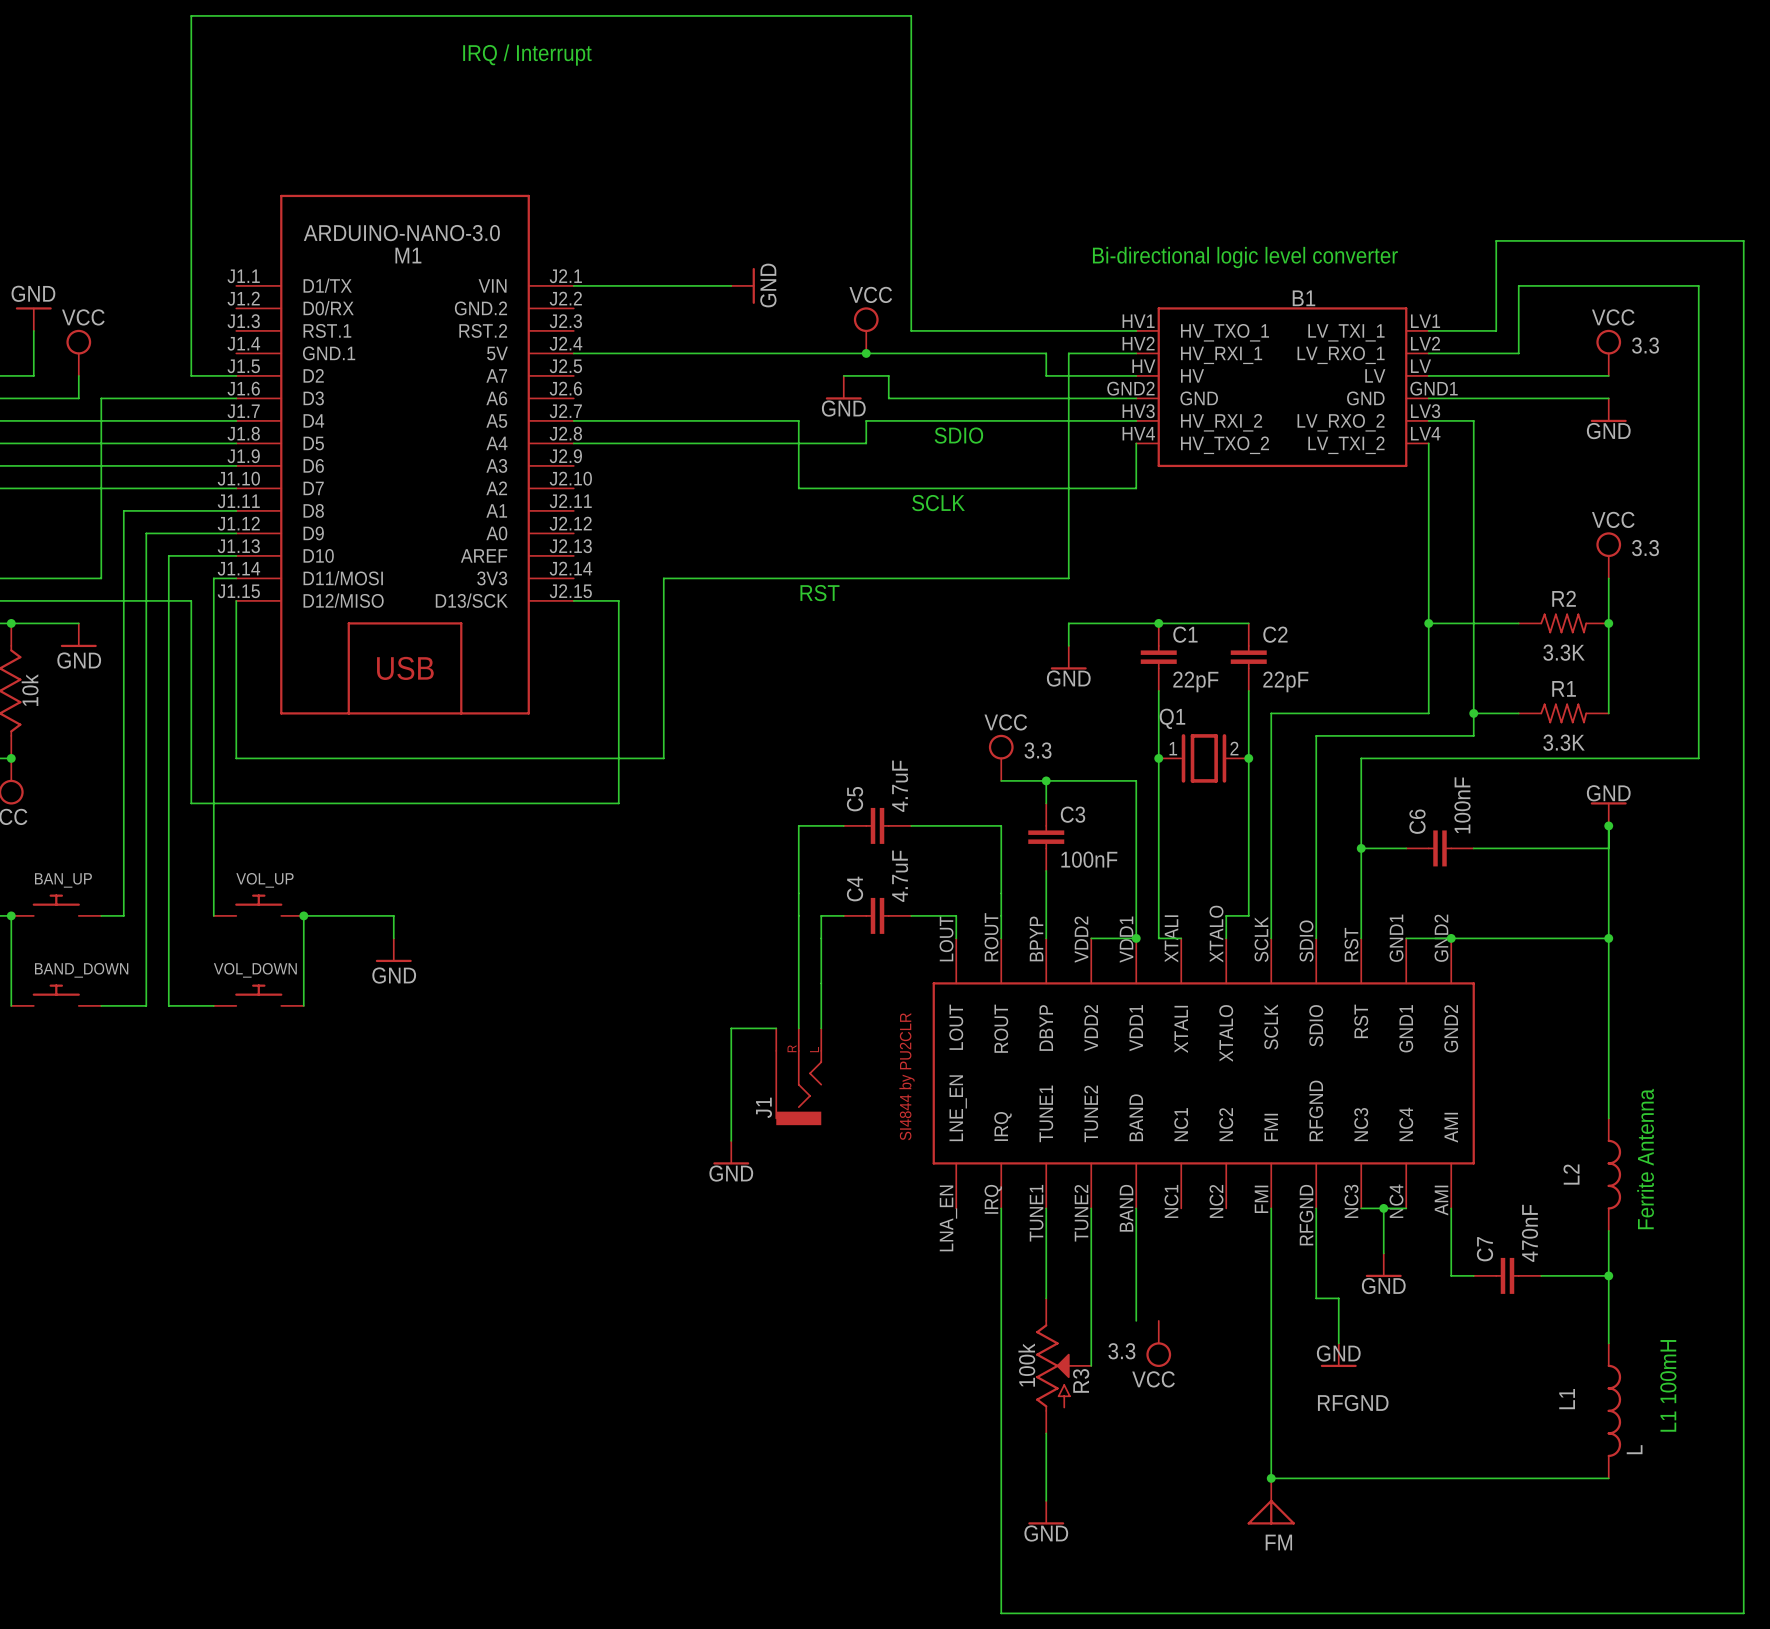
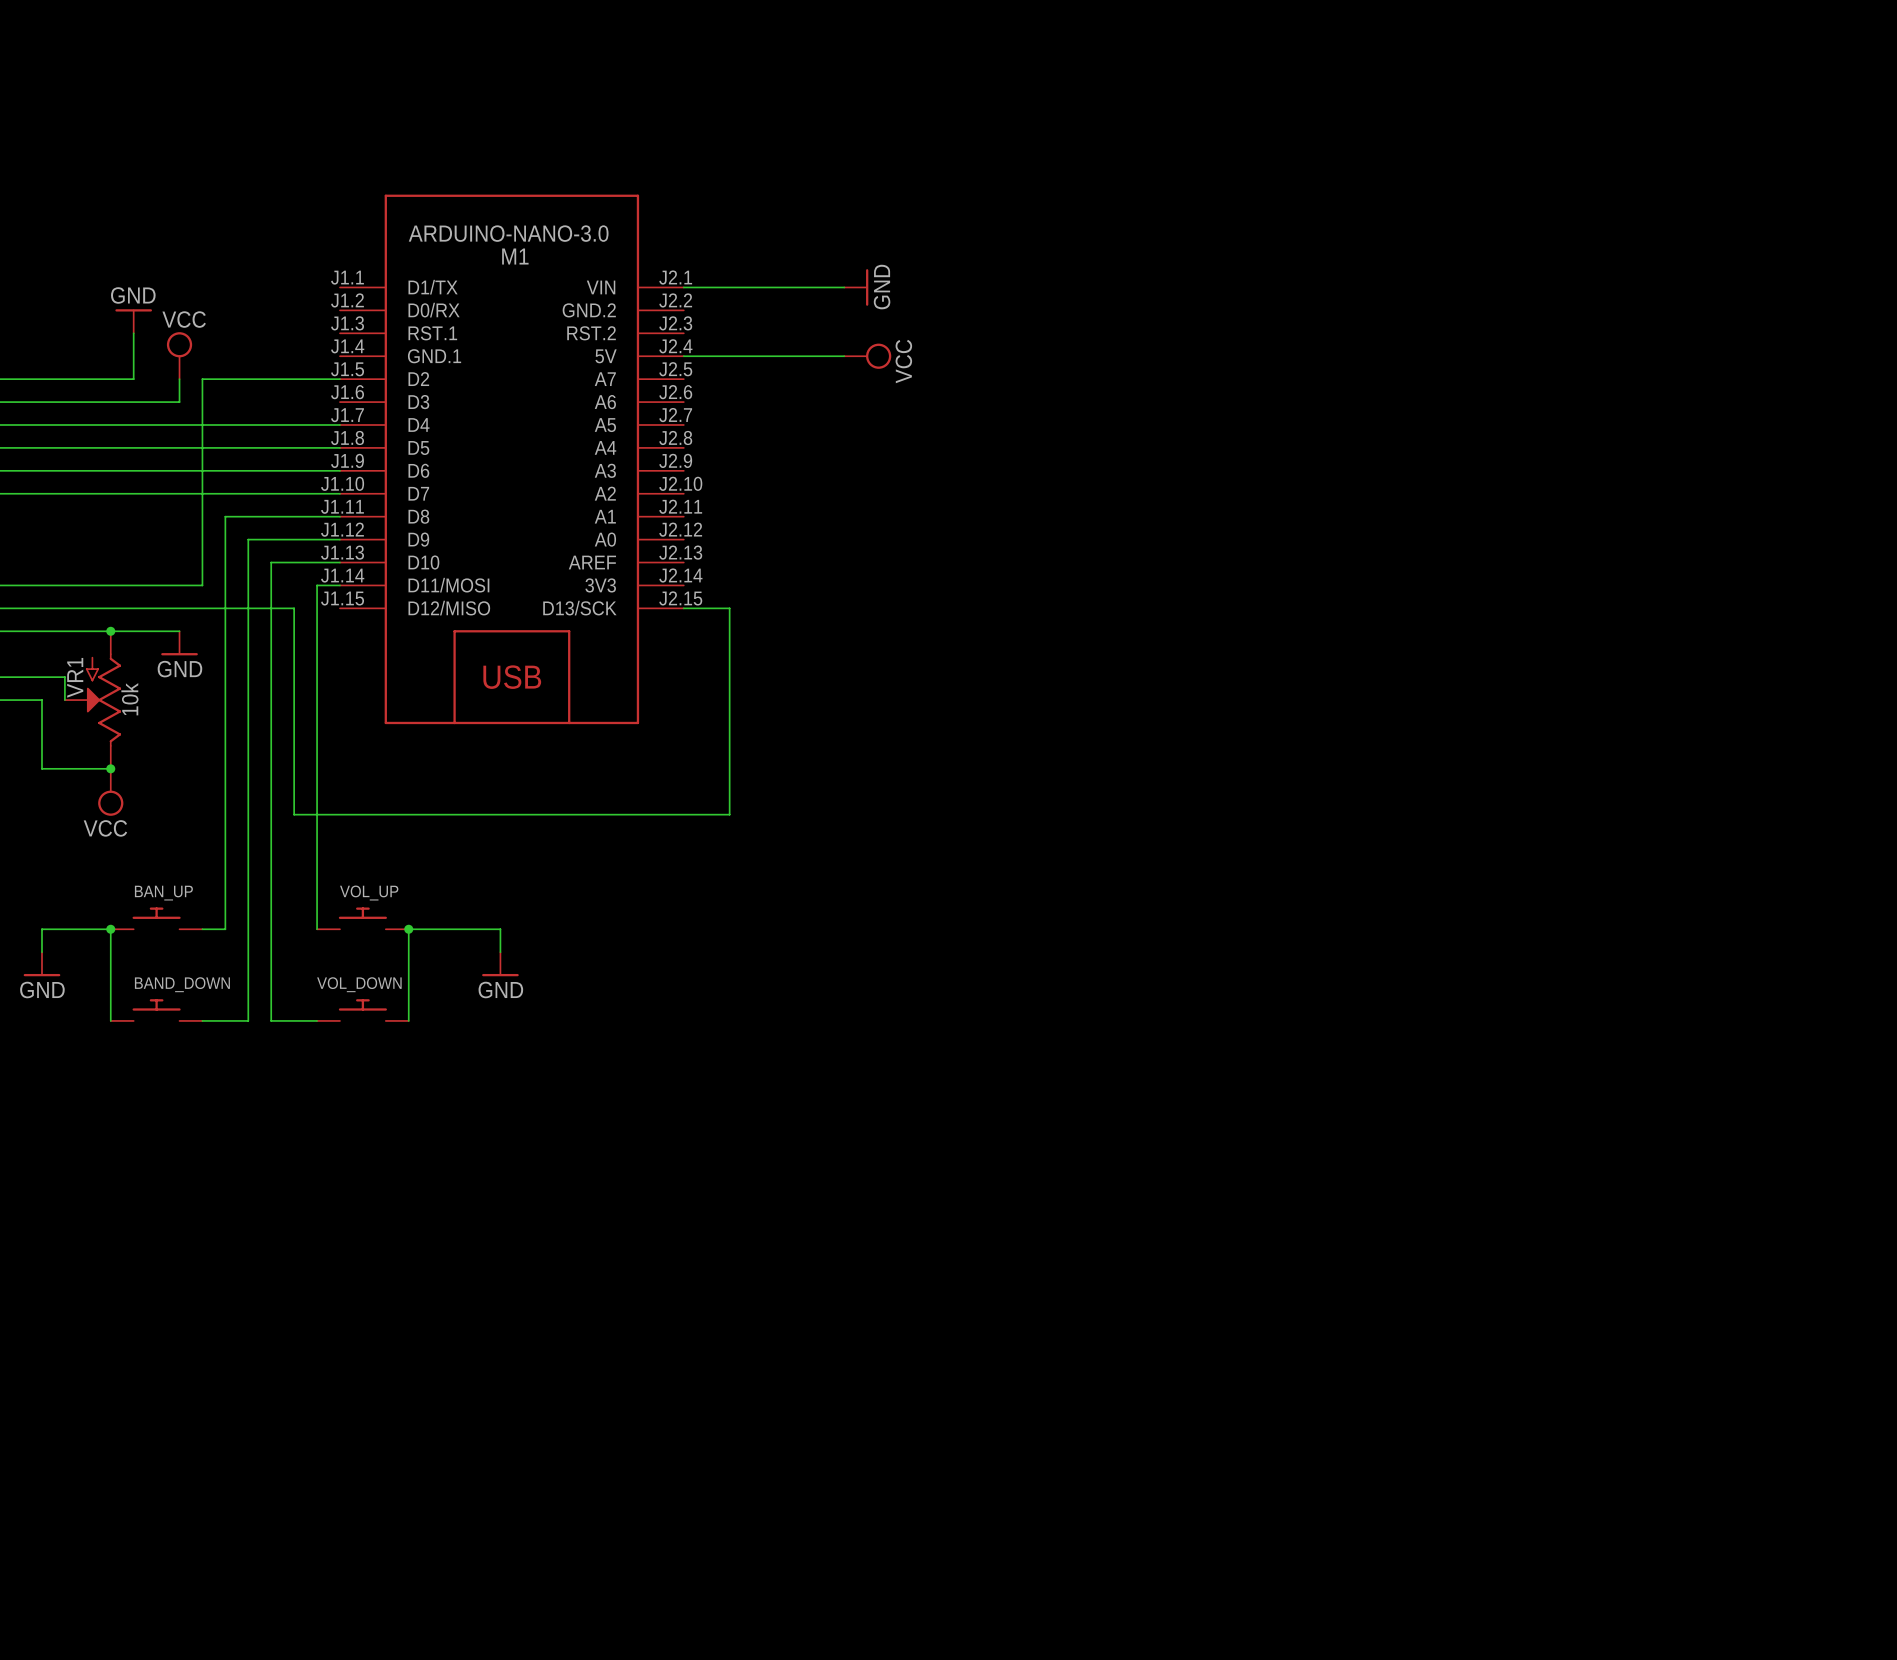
text: IRQ / Interrupt (527, 55) -> none
text: Bi-directional logic level converter (1245, 257) -> none
power symbol rotation: 0° (866, 319) -> 90° clockwise (878, 356)
power symbol position: VCC (866, 330) -> VCC (867, 356)
wire: (1136, 330) (911, 330) (911, 15) (191, 15) (191, 375) -> none
wire: (1428, 330) (1496, 330) (1496, 240) (1743, 240) (1743, 1613) (1001, 1613) (1001, 1208) -> none
power symbol: VCC (1608, 352) -> none
wire: (731, 353) (1046, 353) (1046, 375) (1136, 375) -> none
junction: (866, 353) -> none
wire: (1136, 353) (1068, 353) (1068, 578) (663, 578) (663, 758) (236, 758) (236, 600) -> none
wire: (1428, 353) (1518, 353) (1518, 285) (1698, 285) (1698, 758) (1361, 758) (1361, 938) -> none
wire: (843, 375) (888, 375) (888, 398) (1136, 398) -> none
wire: (1428, 375) (1608, 375) -> none
power symbol: GND (843, 387) -> none
B1: (1282, 387) -> none
wire: (101, 398) (236, 398) -> (202, 402) (202, 379) (294, 379)
wire: (1428, 398) (1608, 398) -> none
power symbol: GND (1608, 410) -> none
wire: (573, 420) (798, 420) (798, 488) (1136, 488) (1136, 443) -> none
wire: (1136, 420) (866, 420) (866, 443) (573, 443) -> none
wire: (1428, 420) (1473, 420) (1473, 735) (1316, 735) (1316, 938) -> none
text: SDIO (958, 435) -> none
wire: (1428, 443) (1428, 713) (1271, 713) (1271, 938) -> none
text: SCLK (938, 503) -> none
power symbol: VCC (1608, 555) -> none
wire: (1608, 578) (1608, 713) -> none
text: RST (819, 593) -> none
junction: (1158, 623) -> none
wire: (1248, 623) (1068, 623) (1068, 645) -> none
wire: (1428, 623) (1518, 623) -> none
junction: (1428, 623) -> none
R2: 3.3K (1563, 623) -> none
junction: (1608, 623) -> none
power symbol: GND (1068, 657) -> none
C1: 22pF (1158, 657) -> none
C2: 22pF (1248, 657) -> none
wire: (1158, 690) (1158, 938) (1181, 938) -> none
wire: (1248, 690) (1248, 915) (1226, 915) (1226, 938) -> none
wire: (1473, 713) (1518, 713) -> none
junction: (1473, 713) -> none
R1: 3.3K (1563, 713) -> none
power symbol: VCC (1001, 757) -> none
junction: (1158, 758) -> none
Q1: (1203, 758) -> none
junction: (1248, 758) -> none
wire: (1001, 780) (1136, 780) (1136, 938) (1091, 938) -> none
wire: (1046, 780) (1046, 803) -> none
junction: (1046, 780) -> none
power symbol: GND (1608, 814) -> none
wire: (843, 825) (798, 825) (798, 1028) -> none
C5: 4.7uF (877, 825) -> none
wire: (911, 825) (1001, 825) (1001, 938) -> none
wire: (1608, 825) (1608, 1118) -> none
junction: (1608, 825) -> none
C3: 100nF (1046, 837) -> none
wire: (1361, 848) (1406, 848) -> none
junction: (1361, 848) -> none
C6: 100nF (1439, 848) -> none
wire: (1473, 848) (1608, 848) -> none
wire: (1046, 870) (1046, 938) -> none
wire: (843, 915) (821, 915) (821, 1028) -> none
C4: 4.7uF (877, 915) -> none
wire: (911, 915) (956, 915) (956, 938) -> none
junction: (1136, 938) -> none
wire: (1406, 938) (1608, 938) -> none
junction: (1451, 938) -> none
junction: (1608, 938) -> none
wire: (776, 1028) (731, 1028) (731, 1140) -> none
part: (1203, 1073) -> none
J1: (798, 1076) -> none
power symbol: GND (731, 1152) -> none
text: Ferrite Antenna (1645, 1159) -> none
L2: (1614, 1174) -> none
wire: (1046, 1208) (1046, 1298) -> none
wire: (1091, 1208) (1091, 1365) -> none
wire: (1136, 1208) (1136, 1320) -> none
wire: (1271, 1208) (1271, 1478) (1608, 1478) -> none
wire: (1316, 1208) (1316, 1298) (1338, 1298) (1338, 1343) -> none
wire: (1361, 1208) (1406, 1208) -> none
wire: (1383, 1208) (1383, 1253) -> none
junction: (1383, 1208) -> none
wire: (1451, 1208) (1451, 1275) (1473, 1275) -> none
wire: (1608, 1230) (1608, 1343) -> none
power symbol: GND (1383, 1265) -> none
C7: 470nF (1507, 1275) -> none
wire: (1541, 1275) (1608, 1275) -> none
junction: (1608, 1275) -> none
power symbol: VCC (1158, 1343) -> none
power symbol: GND (1338, 1355) -> none
R3: 100k (1063, 1365) -> none
text: L1 100mH (1668, 1385) -> none
L1: L (1614, 1410) -> none
wire: (1046, 1433) (1046, 1500) -> none
junction: (1271, 1478) -> none
FM: (1271, 1501) -> none
power symbol: GND (1046, 1512) -> none

